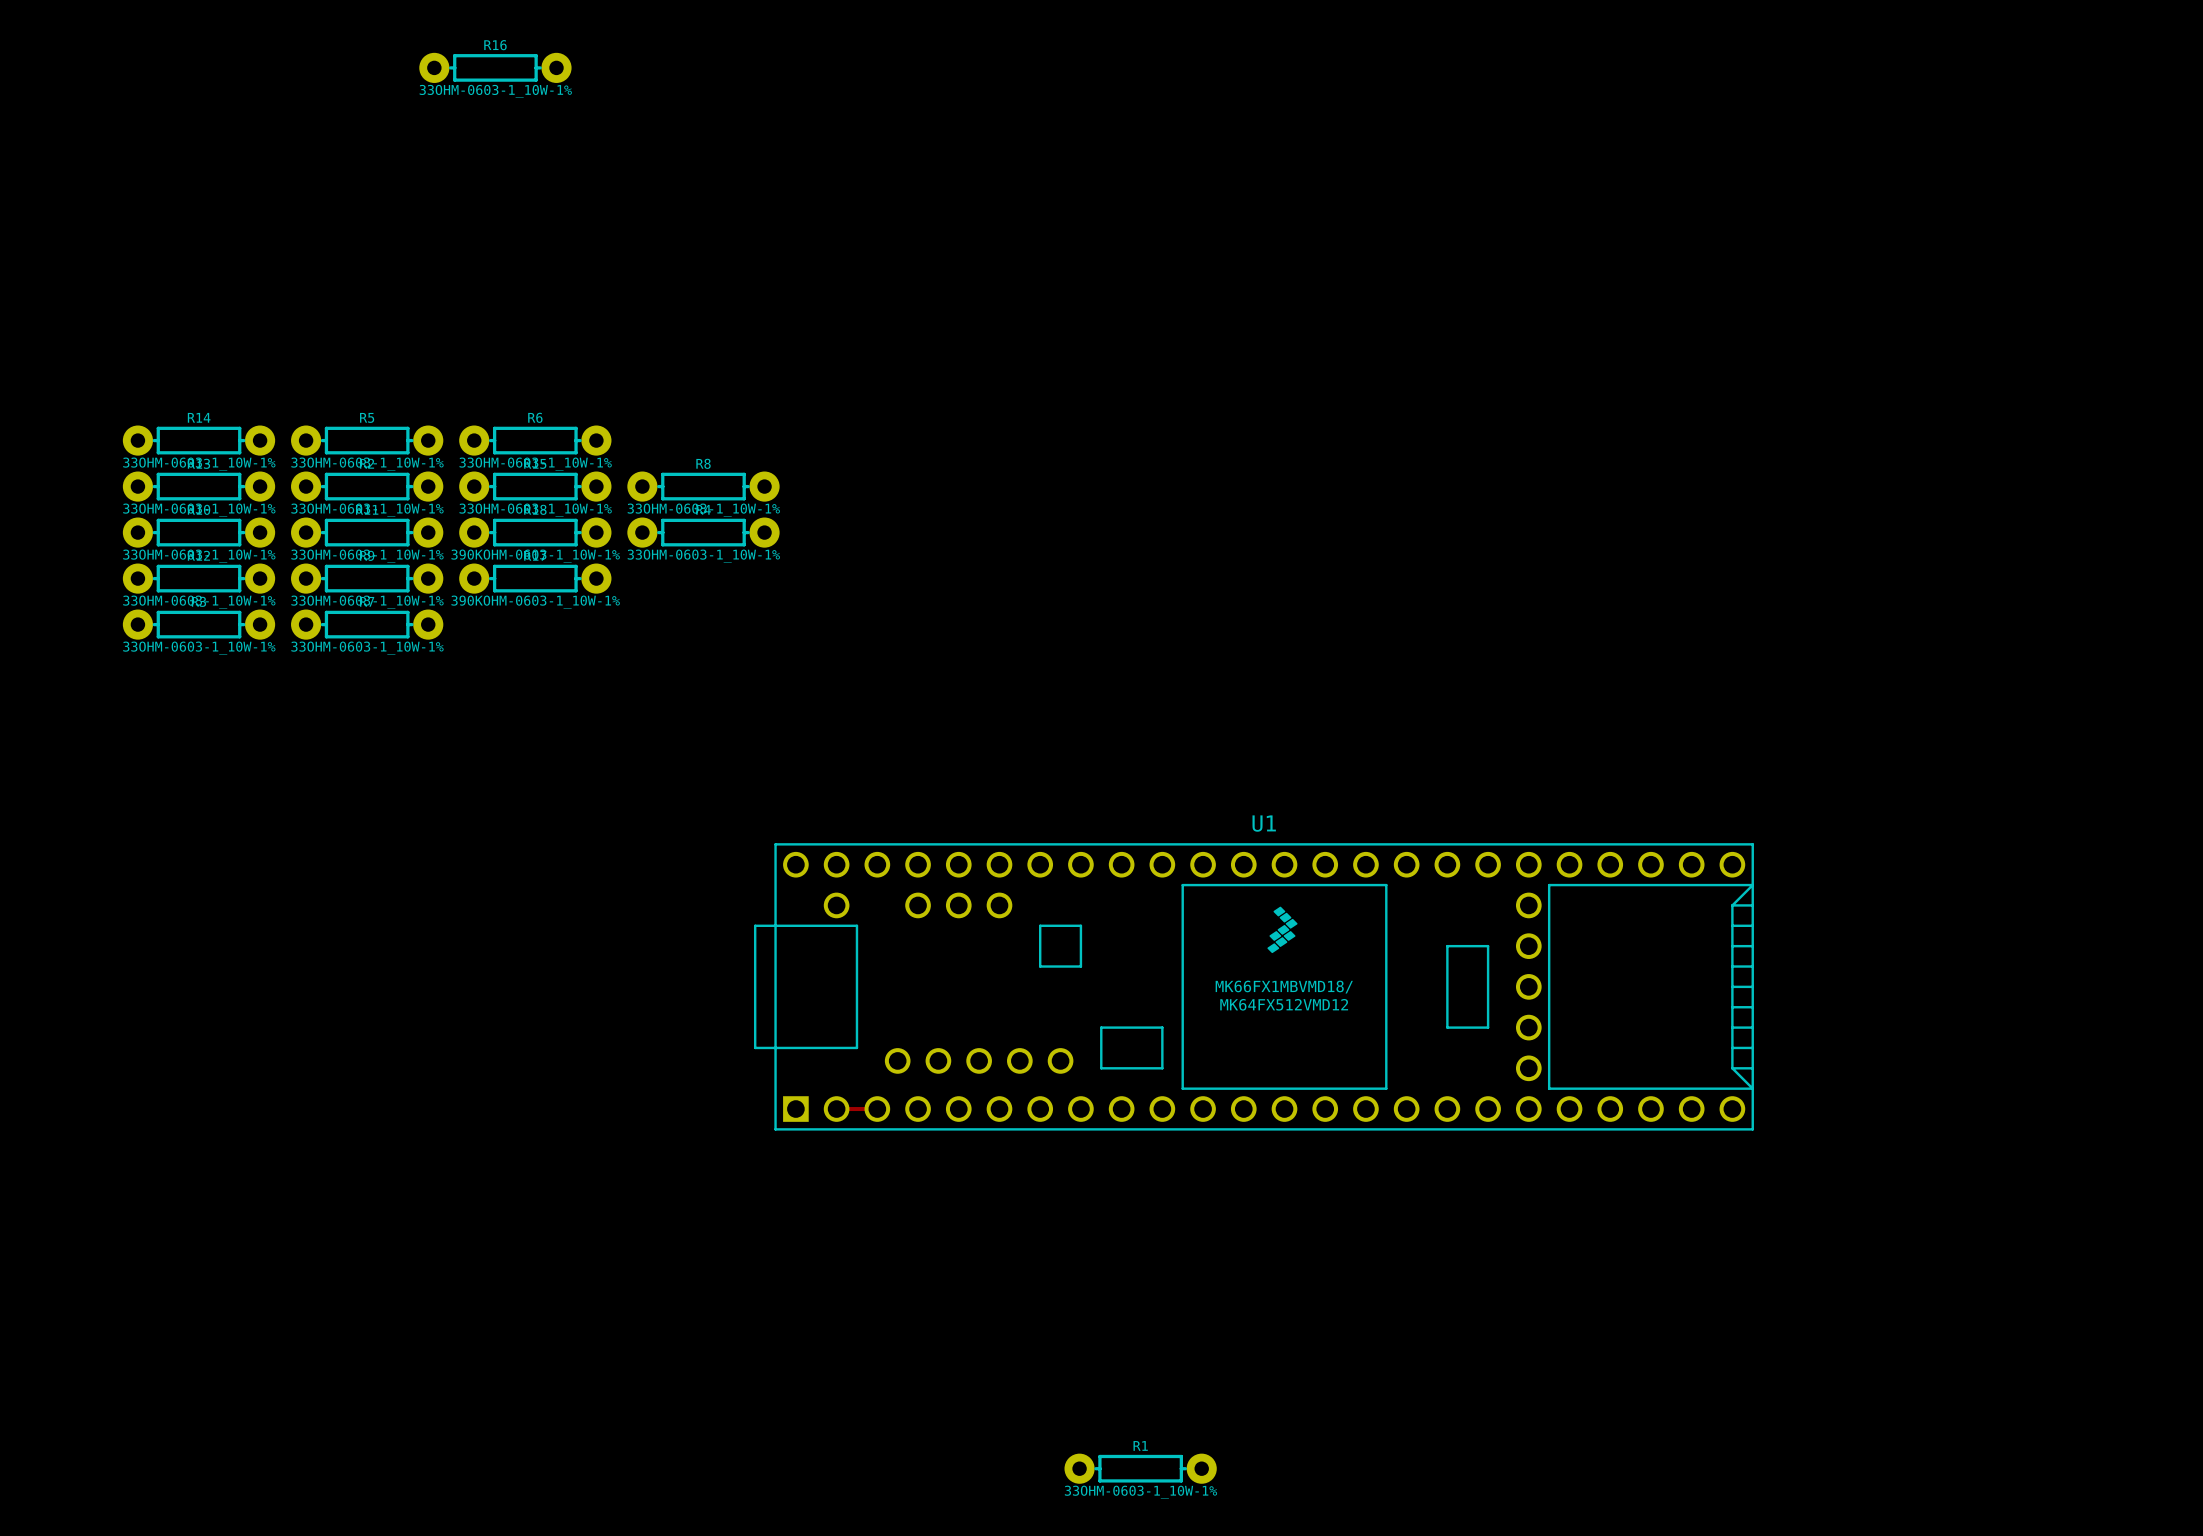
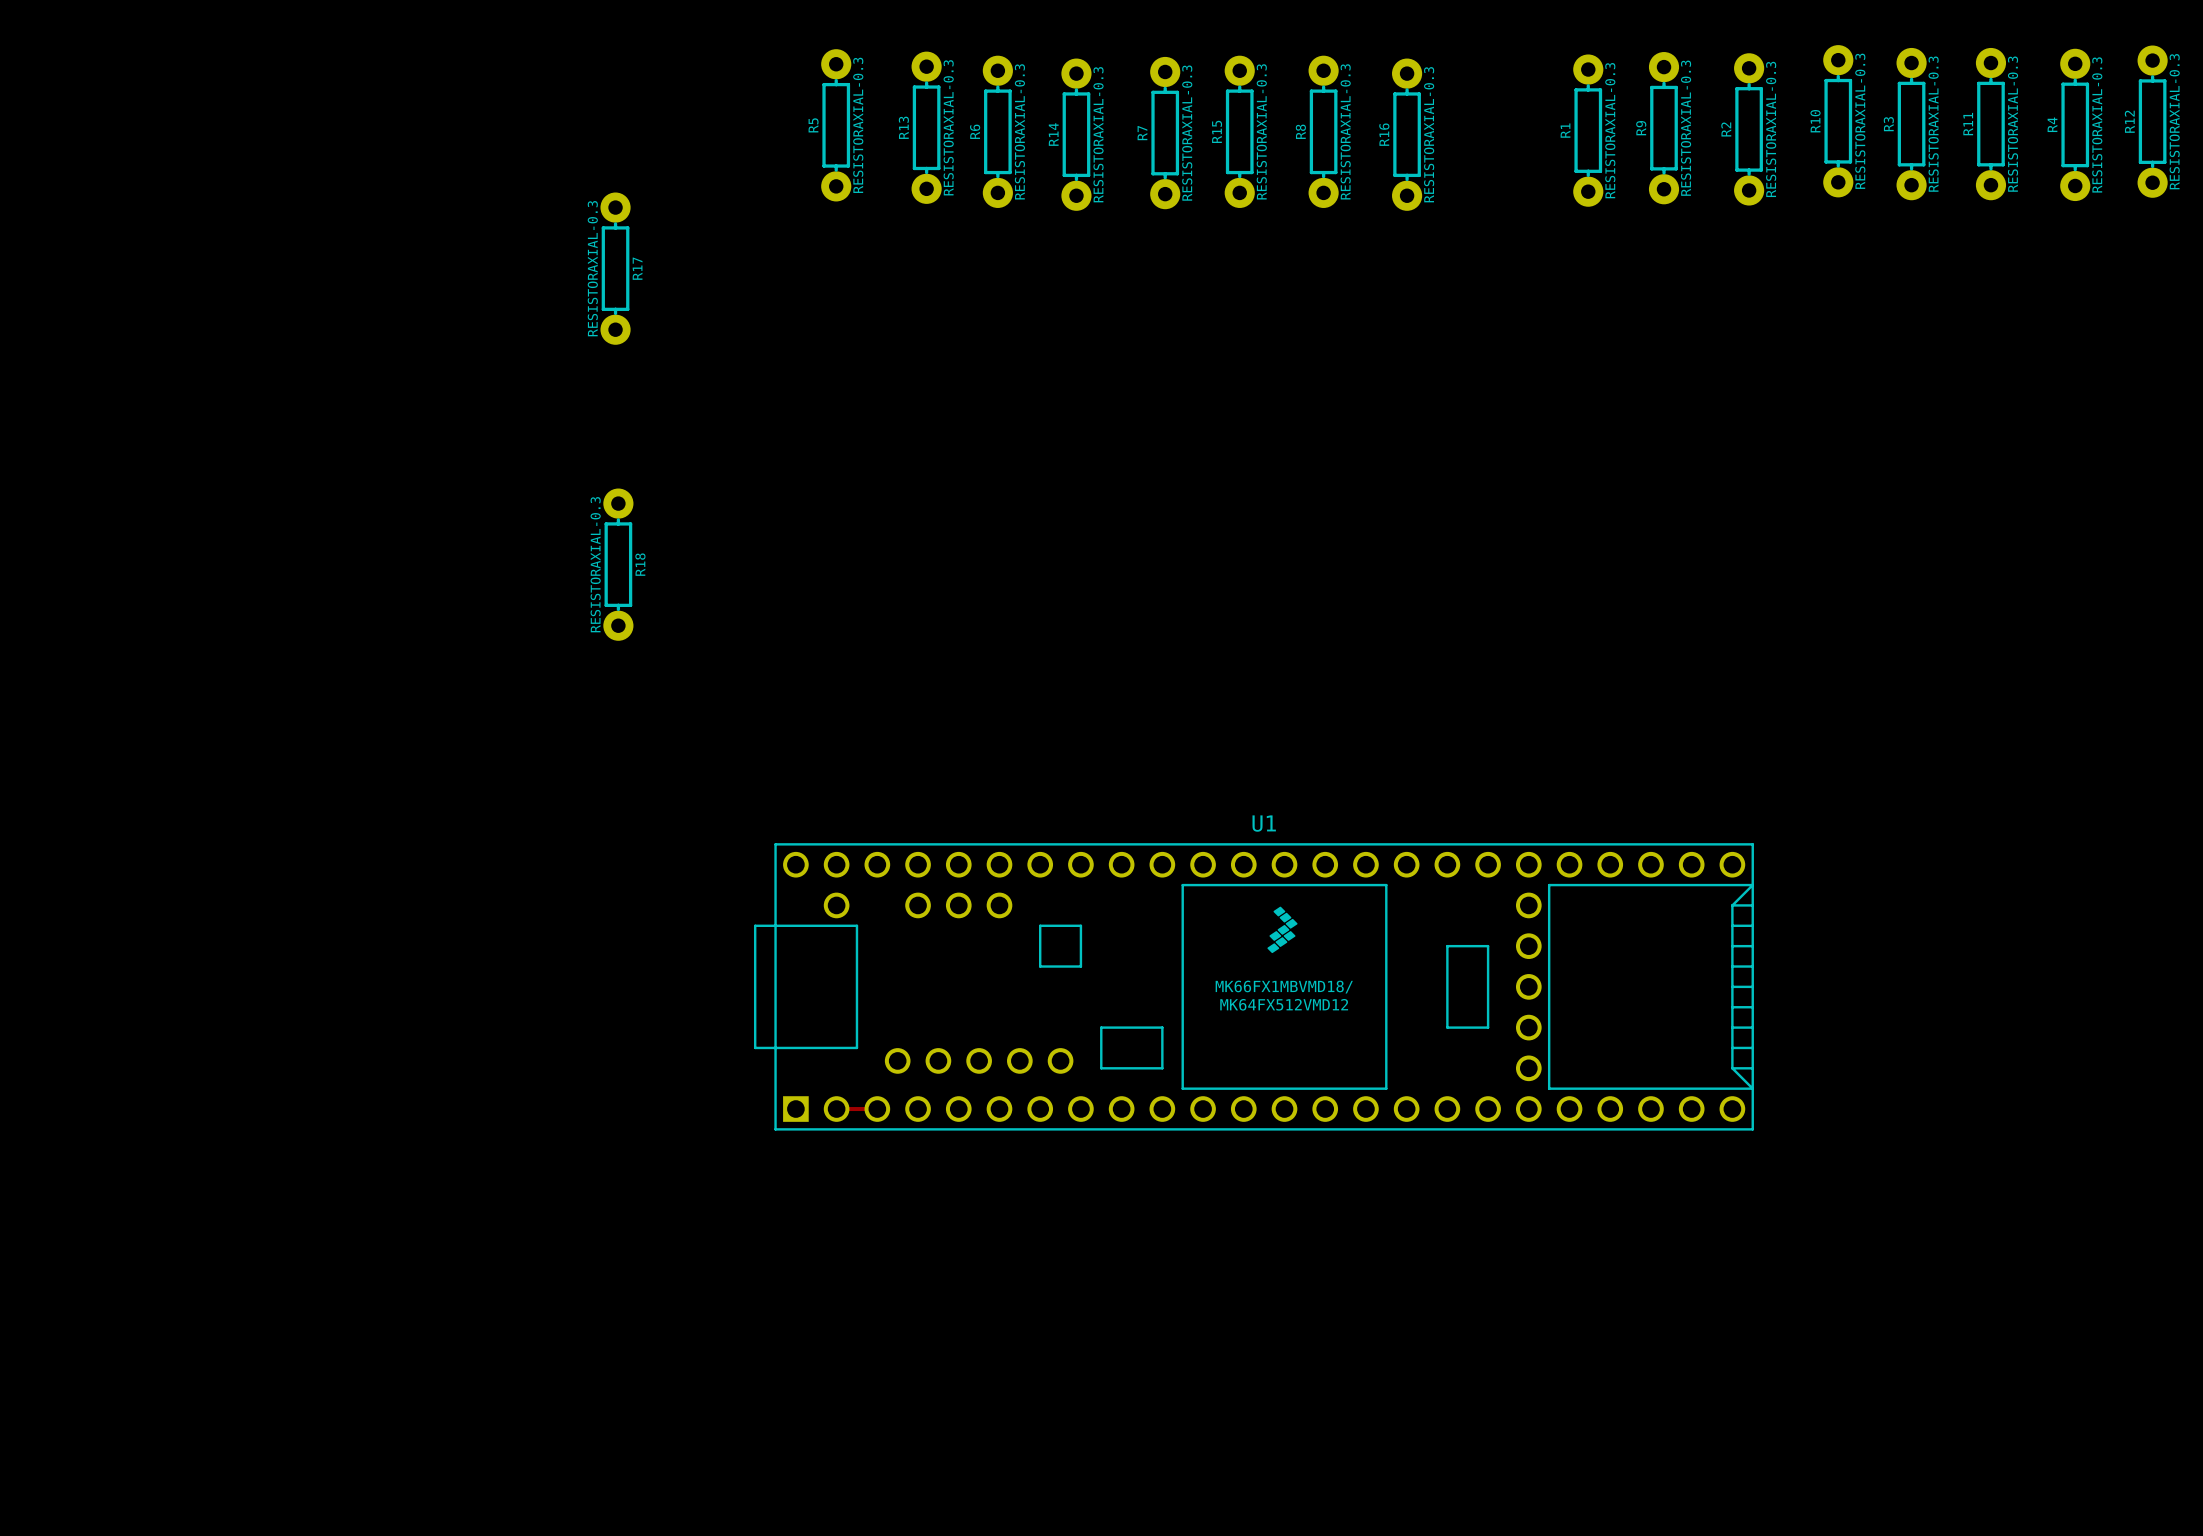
R16 rotation: 0° (495, 67) -> 90° clockwise (1407, 134)
R16 position: (495, 67) -> (1407, 134)
R16 value: 33OHM-0603-1_10W-1% (495, 91) -> RESISTORAXIAL-0.3 (1429, 134)
R14 rotation: 0° (199, 440) -> 90° clockwise (1076, 134)
R14 position: (199, 440) -> (1076, 134)
R5 rotation: 0° (367, 440) -> 90° clockwise (836, 125)
R5 position: (367, 440) -> (836, 125)
R6 rotation: 0° (535, 440) -> 90° clockwise (997, 131)
R6 position: (535, 440) -> (997, 131)
R14 value: 33OHM-0603-1_10W-1% (199, 464) -> RESISTORAXIAL-0.3 (1098, 134)
R5 value: 33OHM-0603-1_10W-1% (367, 464) -> RESISTORAXIAL-0.3 (858, 125)
R6 value: 33OHM-0603-1_10W-1% (535, 464) -> RESISTORAXIAL-0.3 (1019, 131)
R13 rotation: 0° (199, 486) -> 90° clockwise (926, 127)
R13 position: (199, 486) -> (926, 127)
R2 rotation: 0° (367, 486) -> 90° clockwise (1749, 129)
R2 position: (367, 486) -> (1749, 129)
R15 rotation: 0° (535, 486) -> 90° clockwise (1239, 131)
R15 position: (535, 486) -> (1239, 131)
R8 rotation: 0° (703, 486) -> 90° clockwise (1323, 131)
R8 position: (703, 486) -> (1323, 131)
R13 value: 33OHM-0603-1_10W-1% (199, 510) -> RESISTORAXIAL-0.3 (948, 127)
R2 value: 33OHM-0603-1_10W-1% (367, 510) -> RESISTORAXIAL-0.3 (1771, 129)
R15 value: 33OHM-0603-1_10W-1% (535, 510) -> RESISTORAXIAL-0.3 (1261, 131)
R8 value: 33OHM-0603-1_10W-1% (703, 510) -> RESISTORAXIAL-0.3 (1345, 131)
R10 rotation: 0° (199, 532) -> 90° clockwise (1838, 121)
R10 position: (199, 532) -> (1838, 121)
R11 rotation: 0° (367, 532) -> 90° clockwise (1990, 124)
R11 position: (367, 532) -> (1990, 124)
R18 rotation: 0° (535, 532) -> 90° clockwise (618, 564)
R4 rotation: 0° (703, 532) -> 90° clockwise (2075, 124)
R4 position: (703, 532) -> (2075, 124)
R10 value: 33OHM-0603-1_10W-1% (199, 556) -> RESISTORAXIAL-0.3 (1860, 121)
R11 value: 33OHM-0603-1_10W-1% (367, 556) -> RESISTORAXIAL-0.3 (2013, 124)
R18 value: 390KOHM-0603-1_10W-1% (535, 556) -> RESISTORAXIAL-0.3 (595, 564)
R4 value: 33OHM-0603-1_10W-1% (703, 556) -> RESISTORAXIAL-0.3 (2097, 124)
R12 rotation: 0° (199, 578) -> 90° clockwise (2152, 121)
R12 position: (199, 578) -> (2152, 121)
R9 rotation: 0° (367, 578) -> 90° clockwise (1664, 128)
R9 position: (367, 578) -> (1664, 128)
R17 rotation: 0° (535, 578) -> 90° clockwise (615, 268)
R17 position: (535, 578) -> (615, 268)
R12 value: 33OHM-0603-1_10W-1% (199, 602) -> RESISTORAXIAL-0.3 (2174, 121)
R9 value: 33OHM-0603-1_10W-1% (367, 602) -> RESISTORAXIAL-0.3 (1686, 128)
R17 value: 390KOHM-0603-1_10W-1% (535, 602) -> RESISTORAXIAL-0.3 (592, 268)
R3 rotation: 0° (199, 624) -> 90° clockwise (1911, 124)
R3 position: (199, 624) -> (1911, 124)
R7 rotation: 0° (367, 624) -> 90° clockwise (1165, 133)
R7 position: (367, 624) -> (1165, 133)
R3 value: 33OHM-0603-1_10W-1% (199, 648) -> RESISTORAXIAL-0.3 (1933, 124)
R7 value: 33OHM-0603-1_10W-1% (367, 648) -> RESISTORAXIAL-0.3 (1187, 133)
R1 rotation: 0° (1140, 1468) -> 90° clockwise (1588, 130)
R1 position: (1140, 1468) -> (1588, 130)
R1 value: 33OHM-0603-1_10W-1% (1140, 1492) -> RESISTORAXIAL-0.3 (1610, 130)

